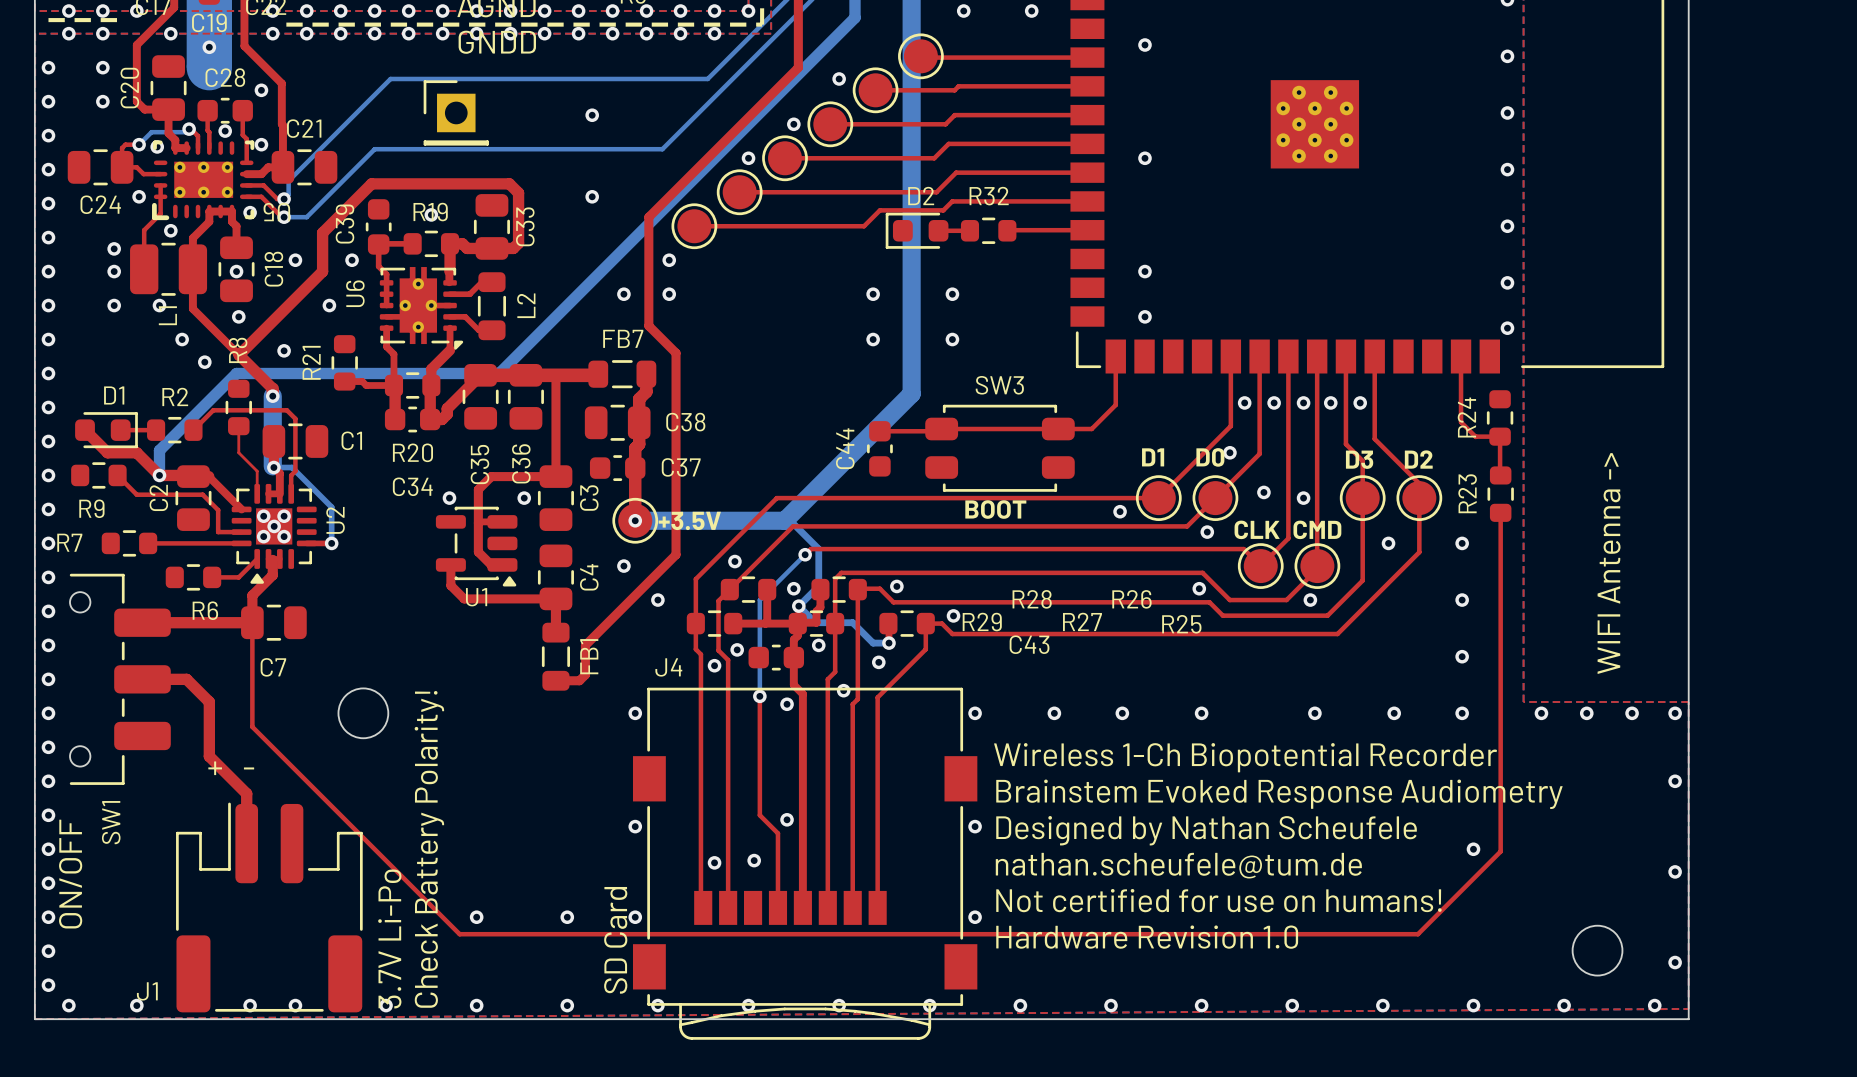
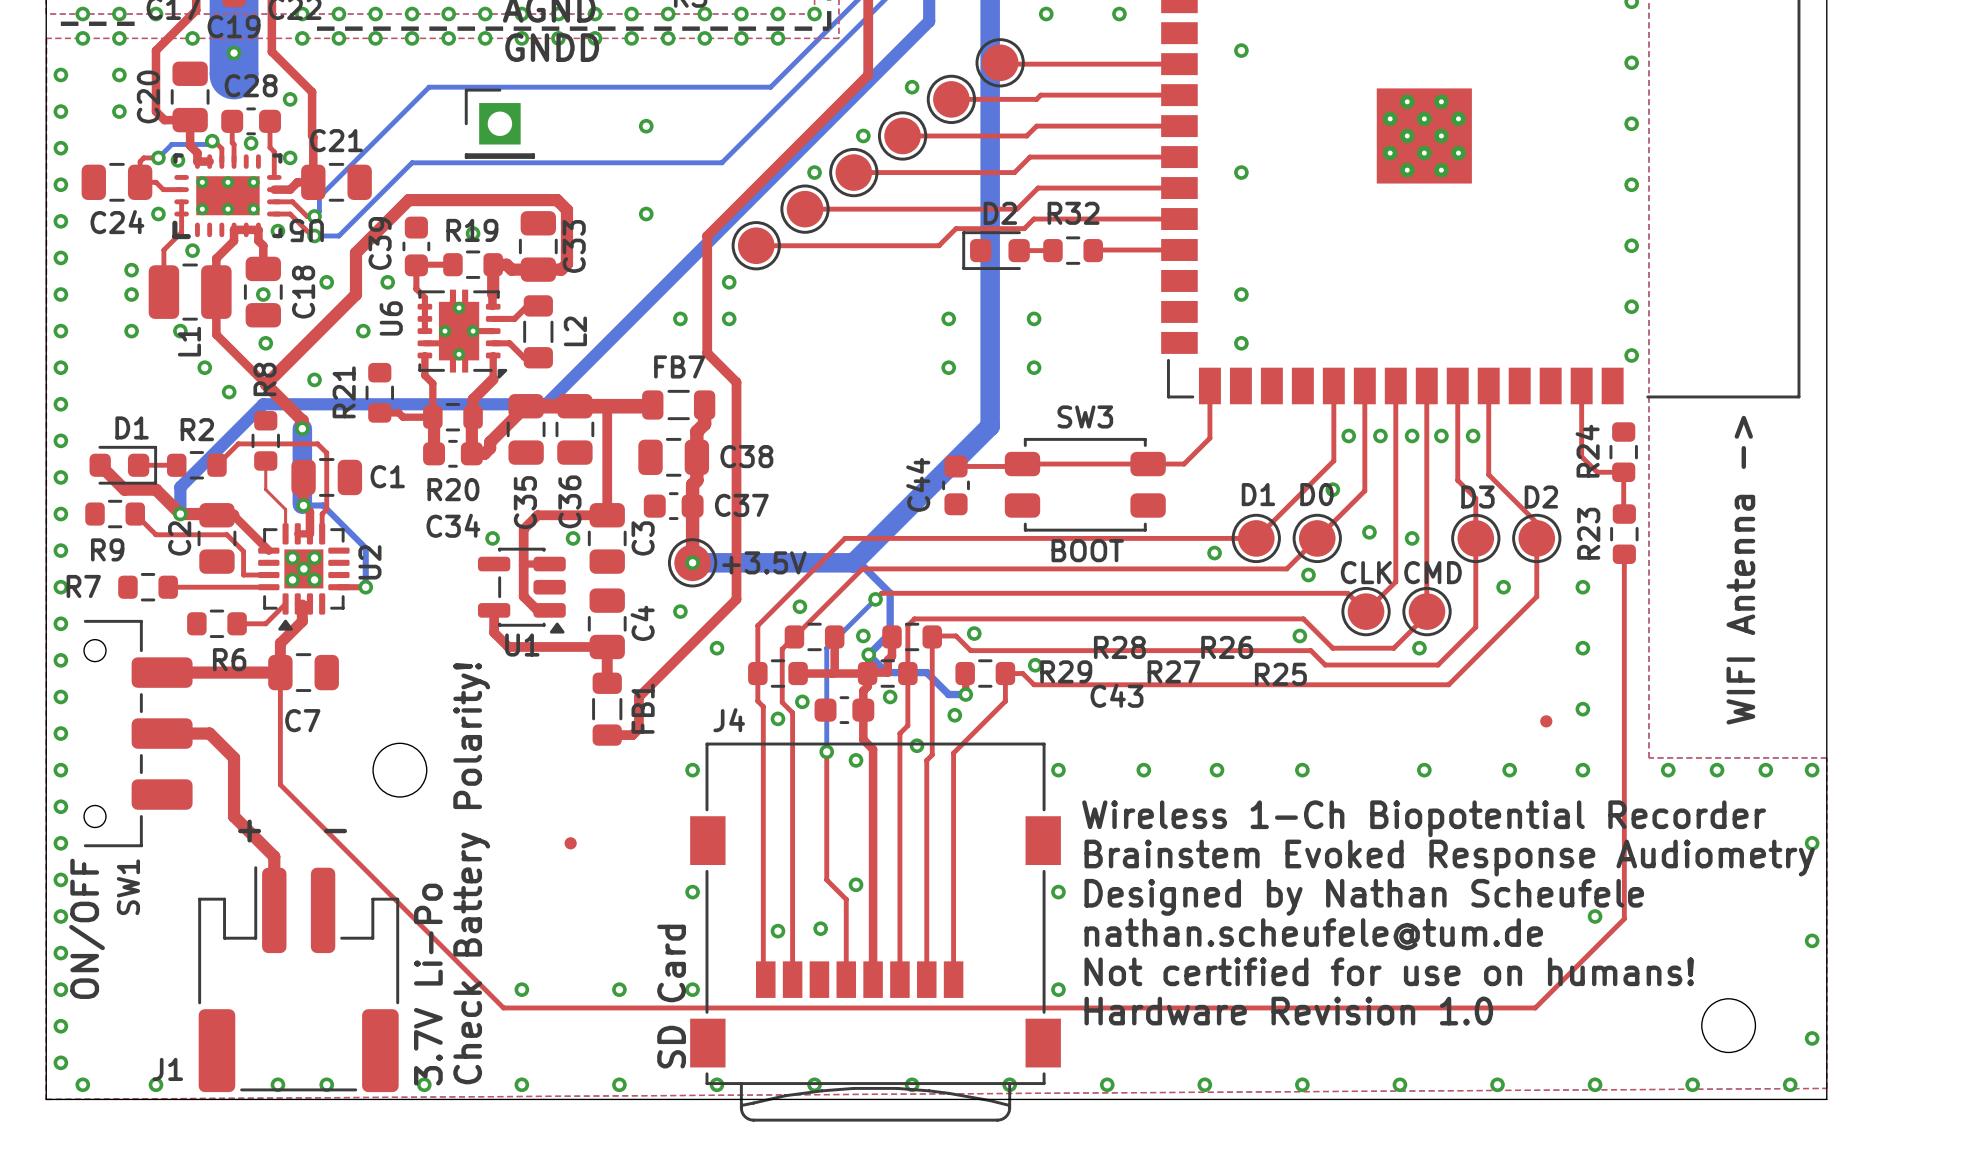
part: none -> (1546, 721)
part: none -> (570, 843)

